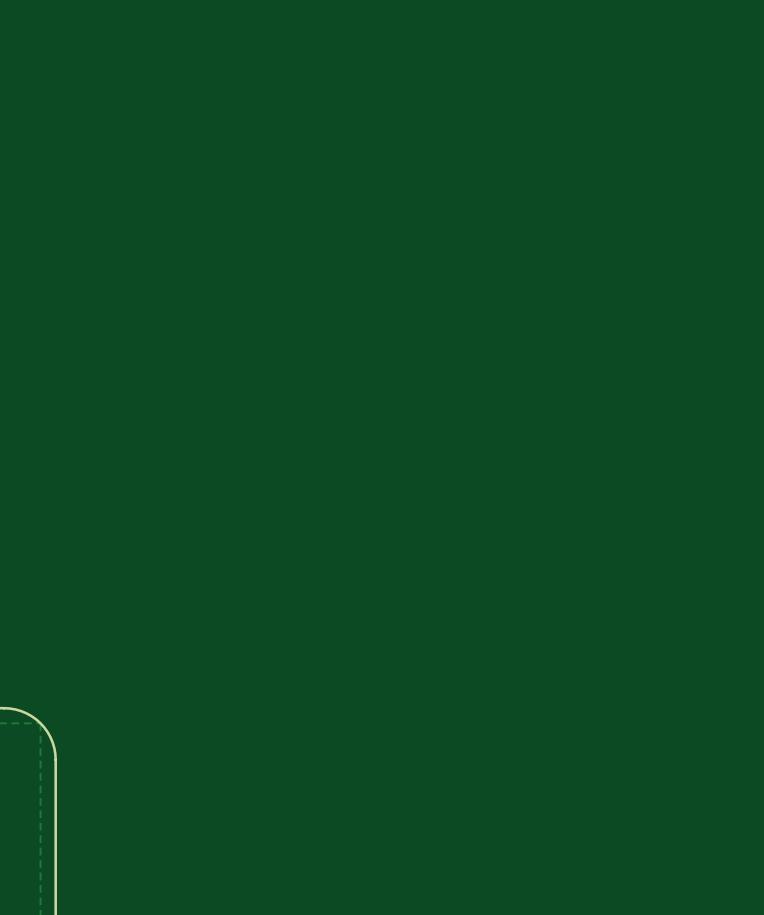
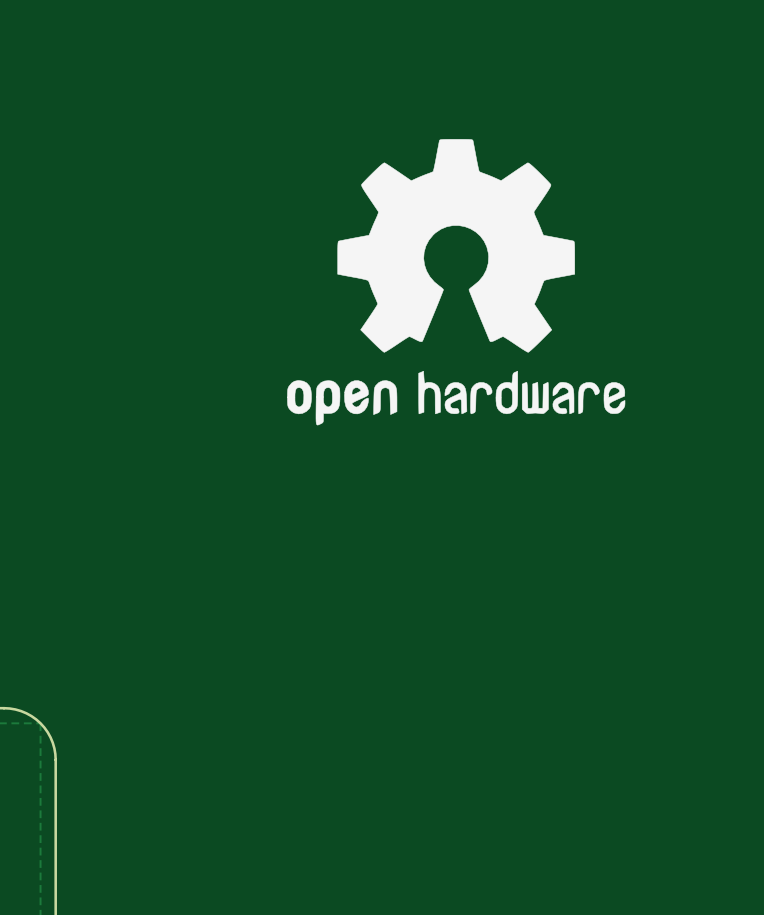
drawing: none -> [287, 139, 626, 426]

